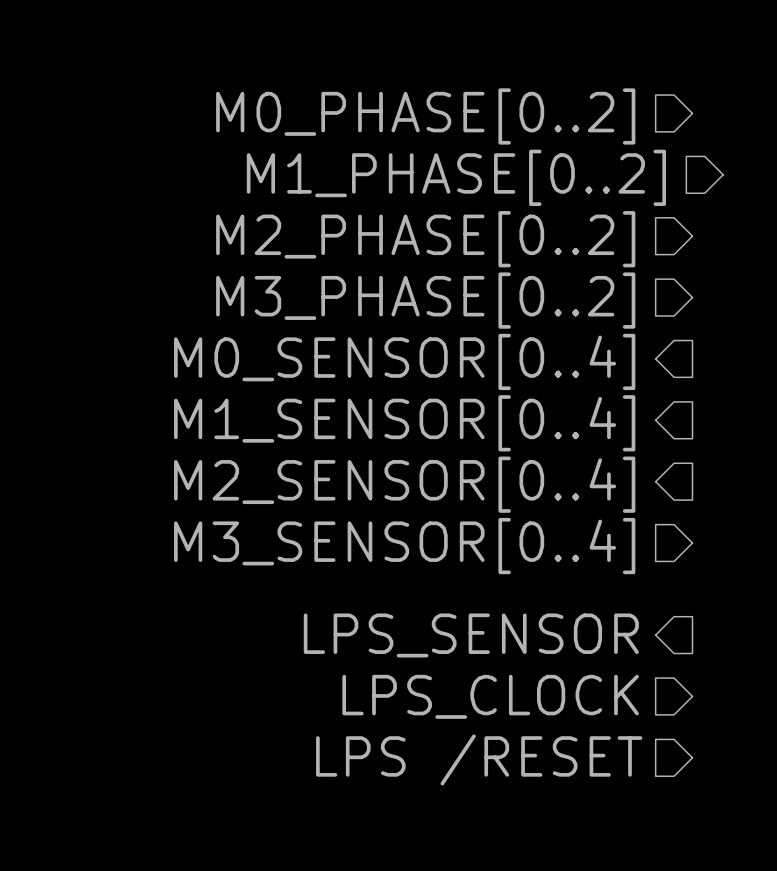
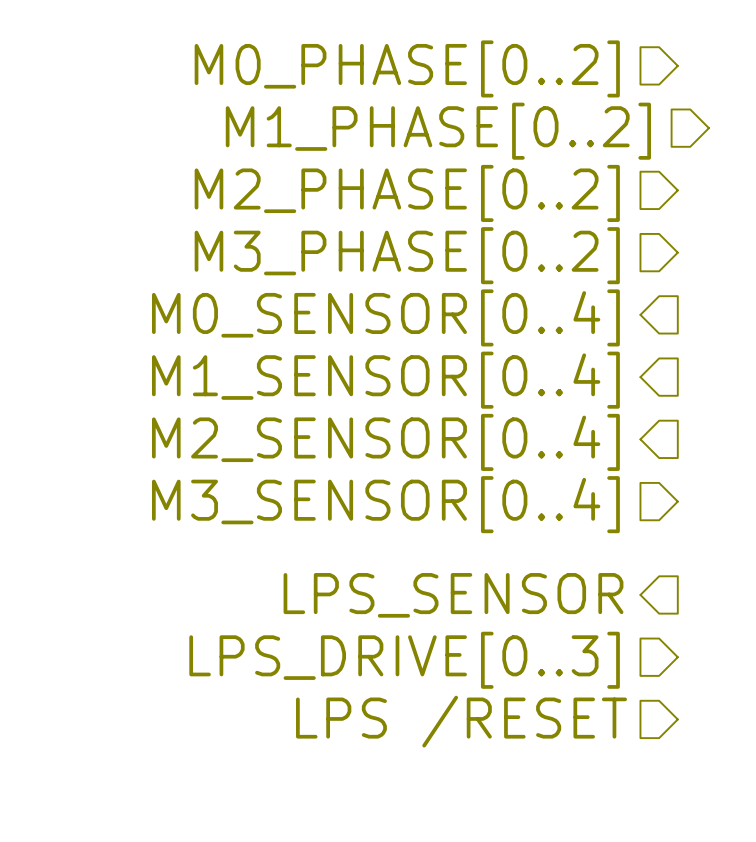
hierarchical label: LPS_CLOCK (490, 696) -> LPS_DRIVE[0..3] (404, 660)

